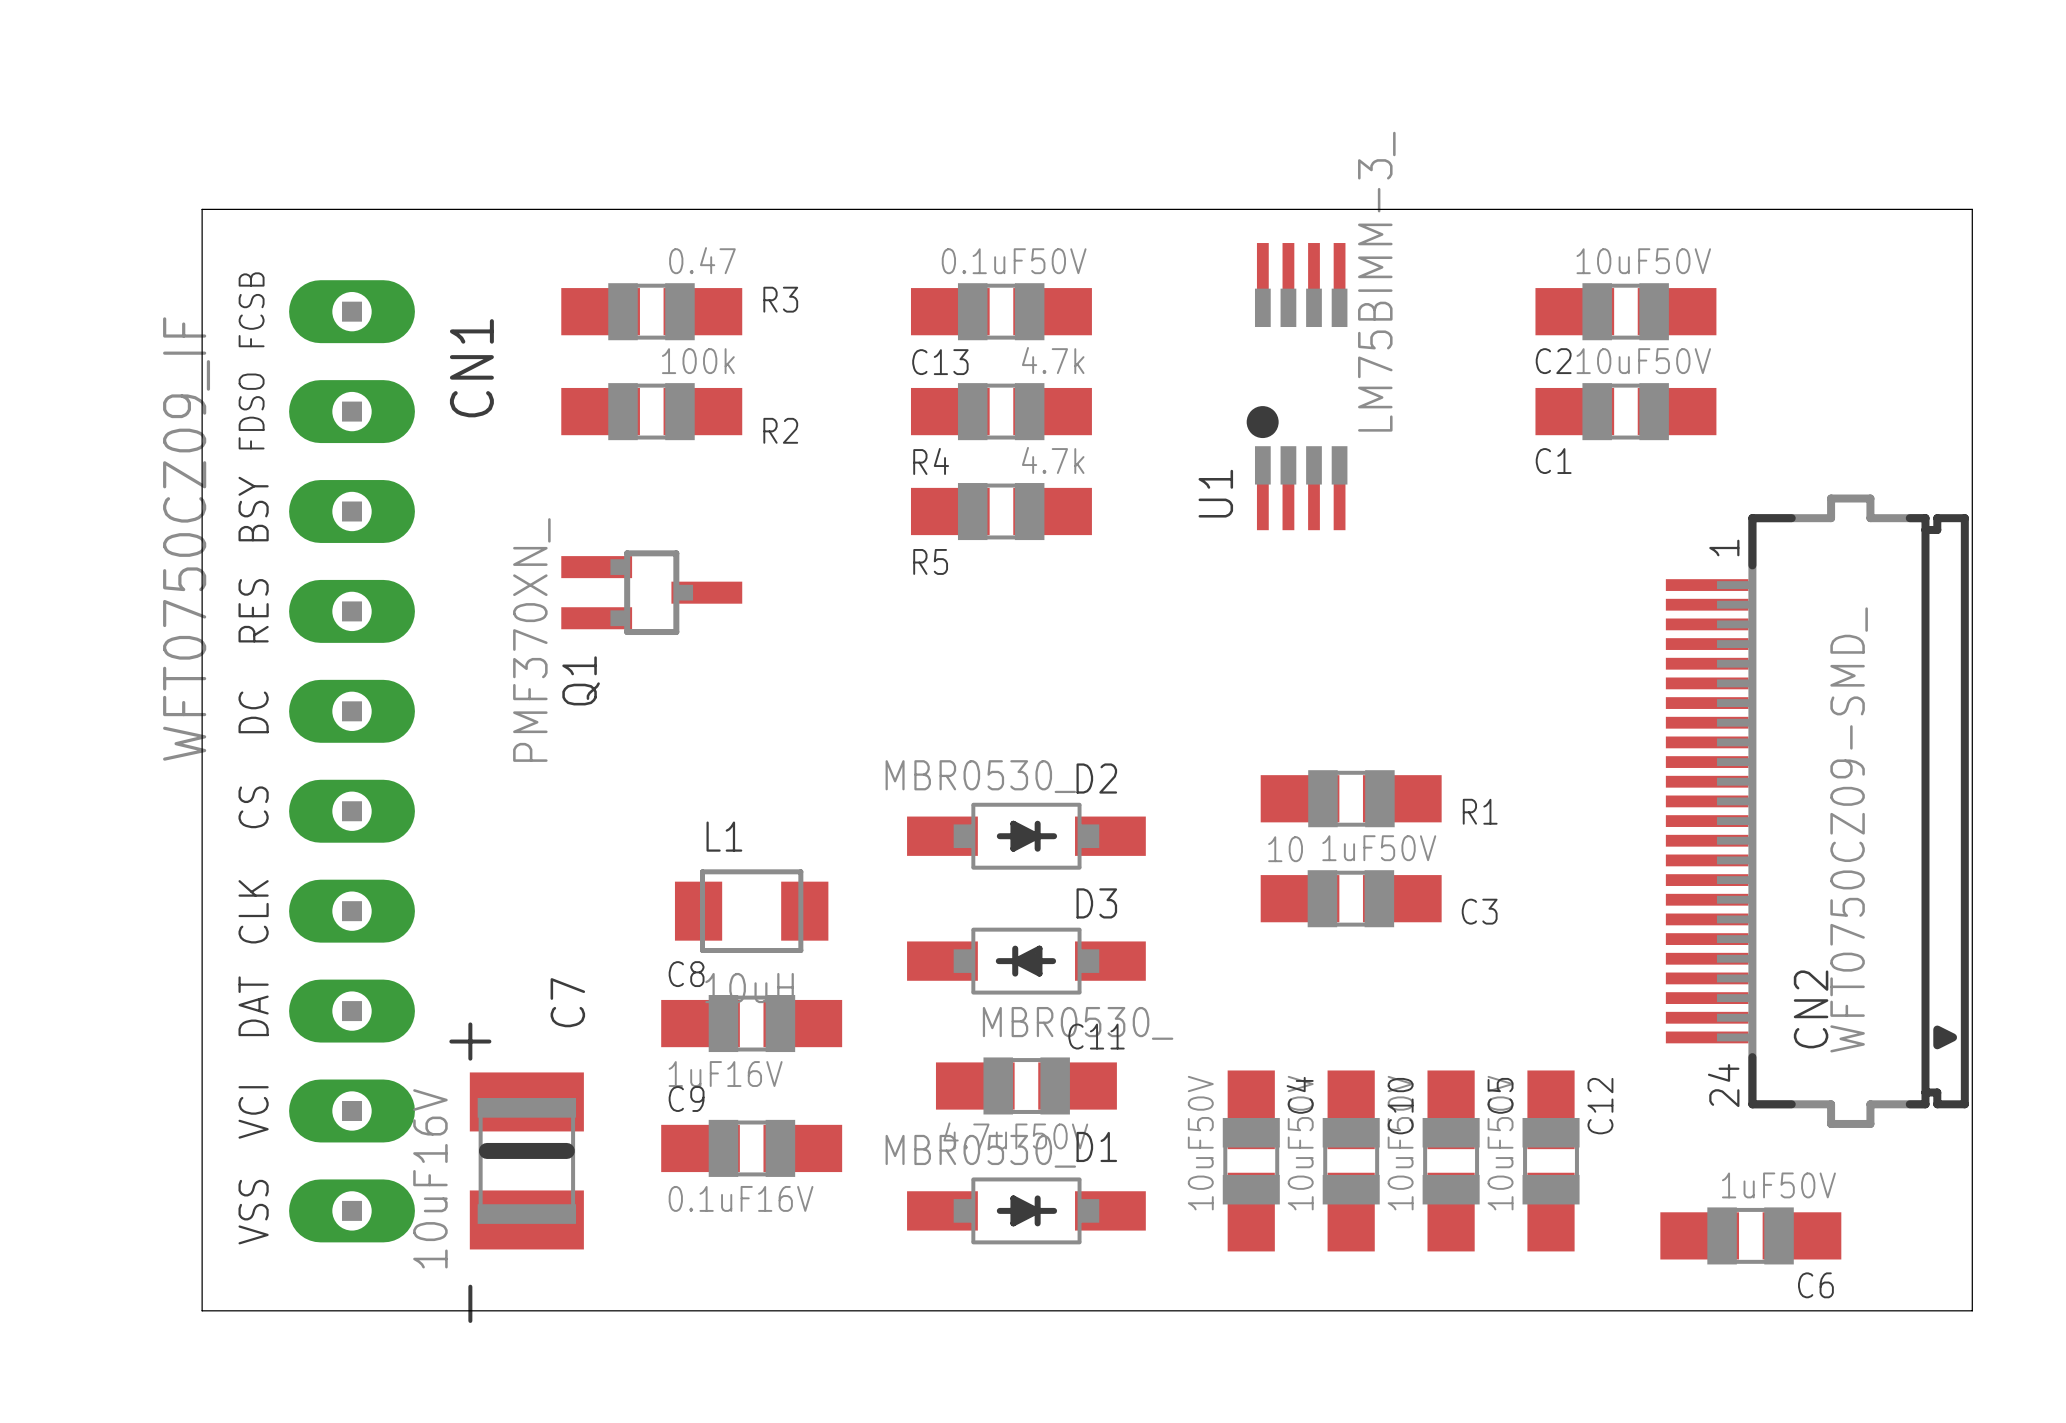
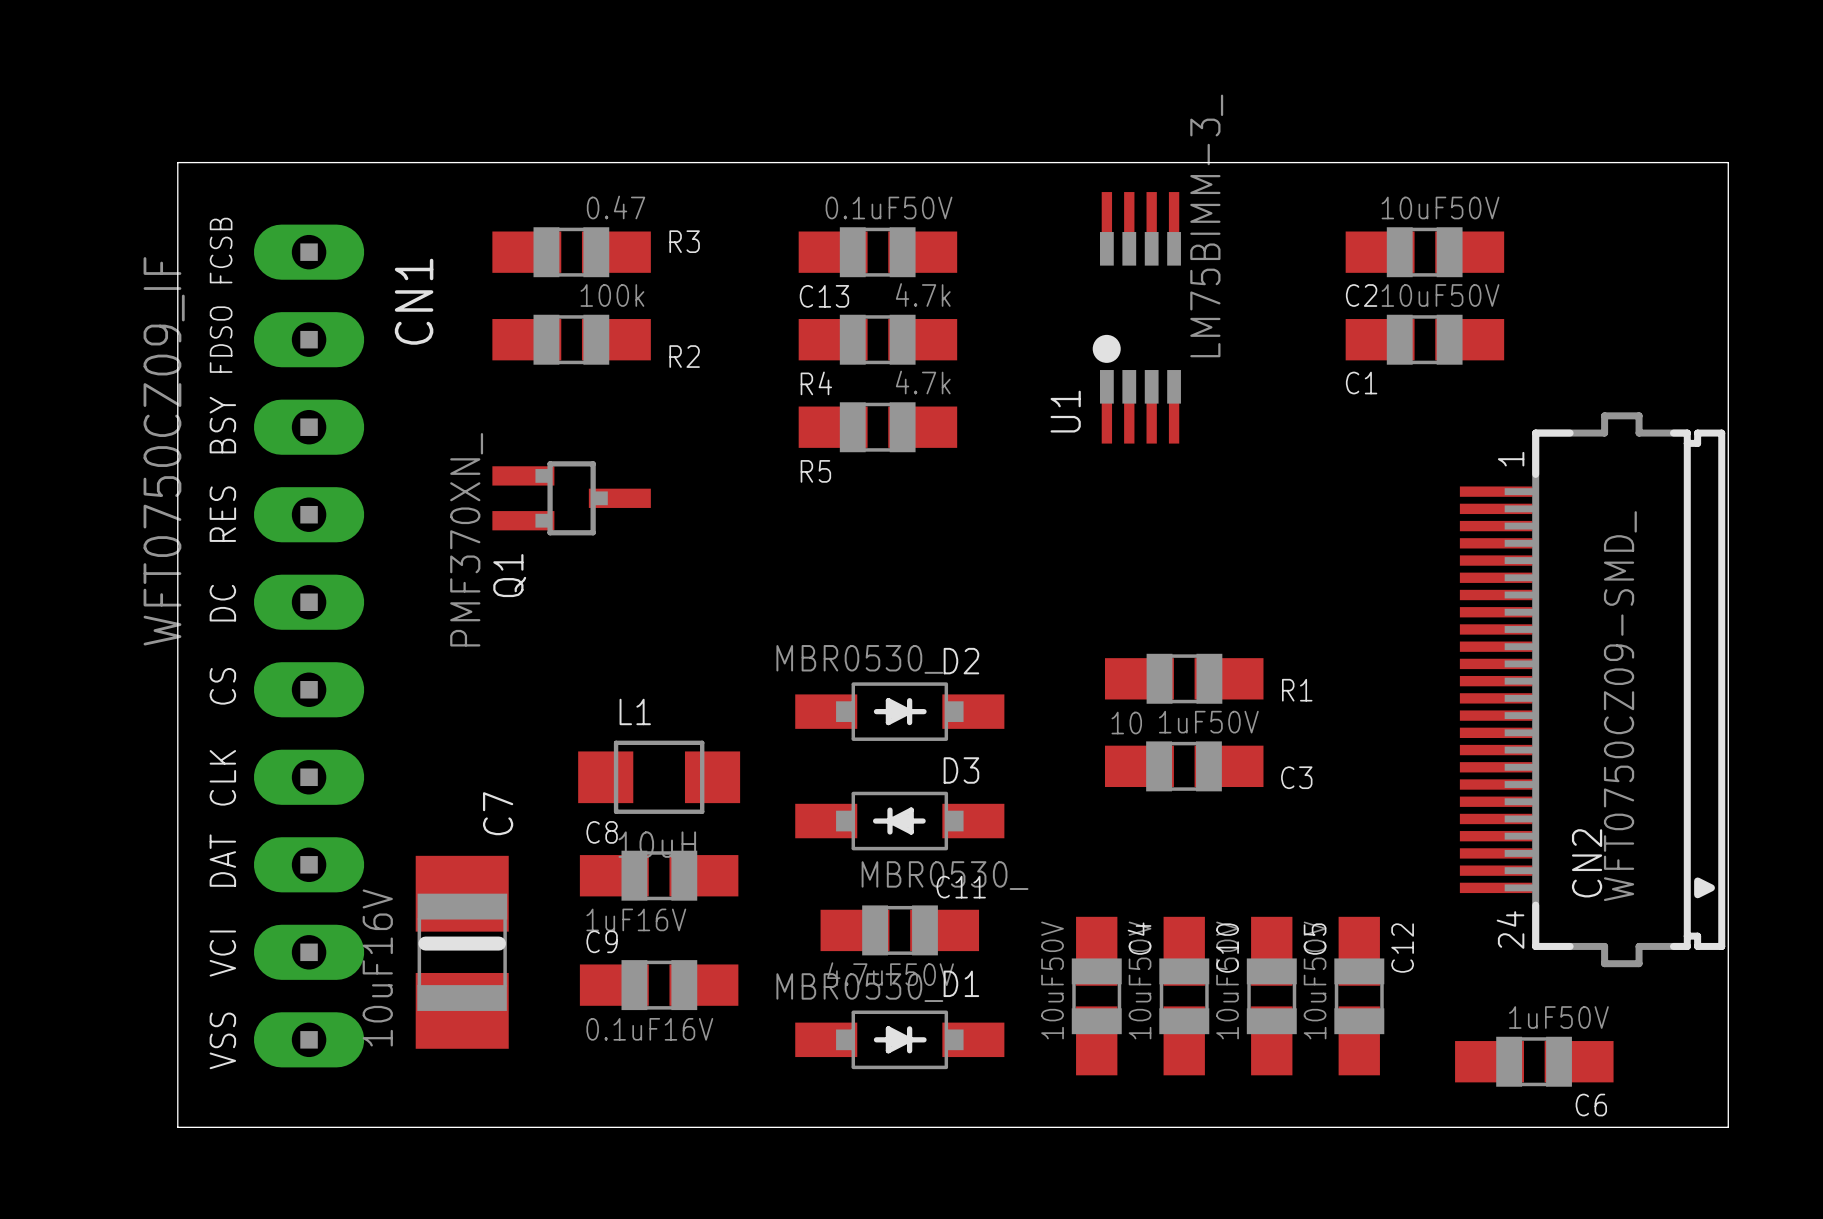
L1 footprint: [674, 869, 829, 953] -> [578, 740, 741, 814]
C7 footprint: [469, 1072, 584, 1250] -> [415, 855, 509, 1049]

